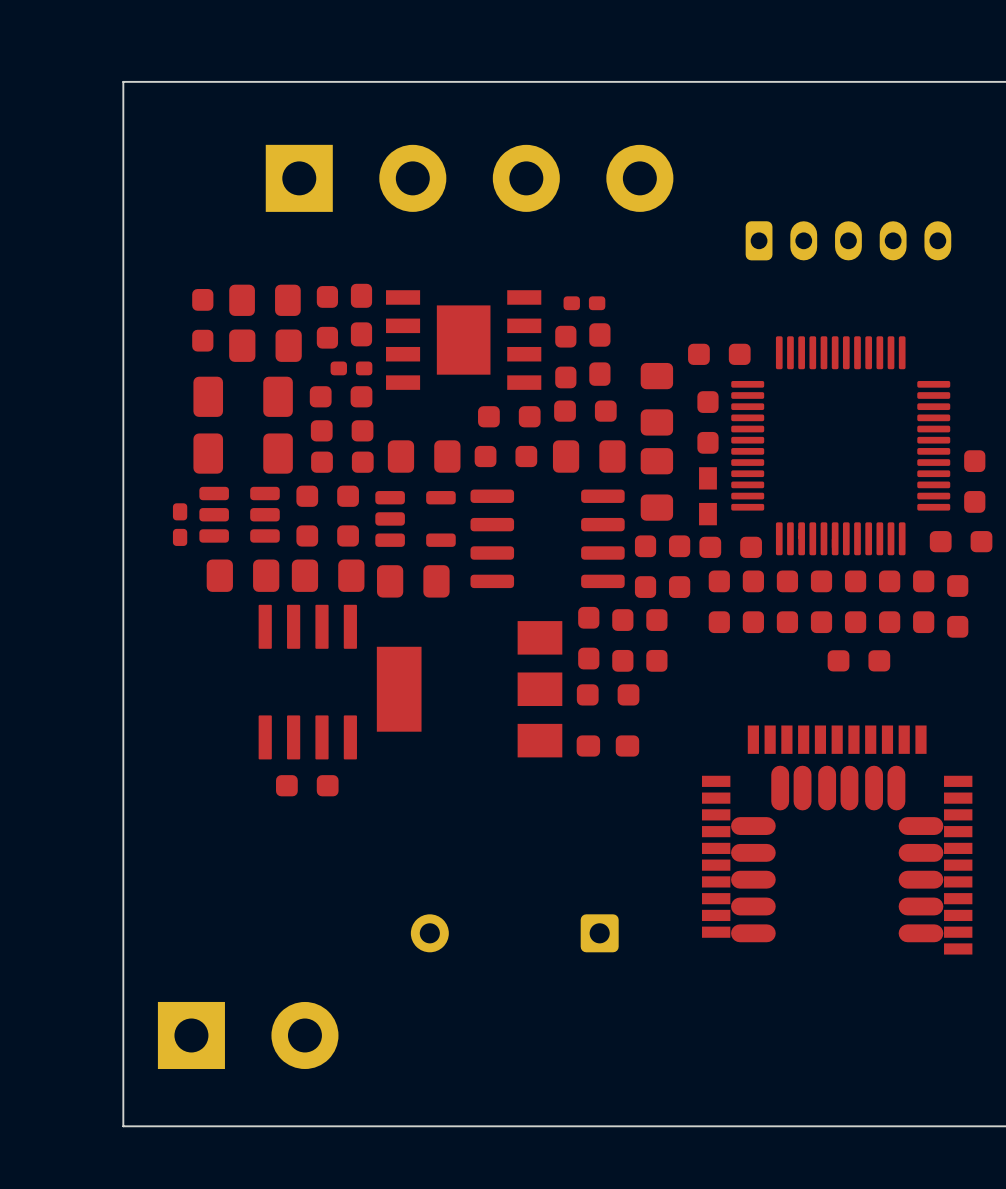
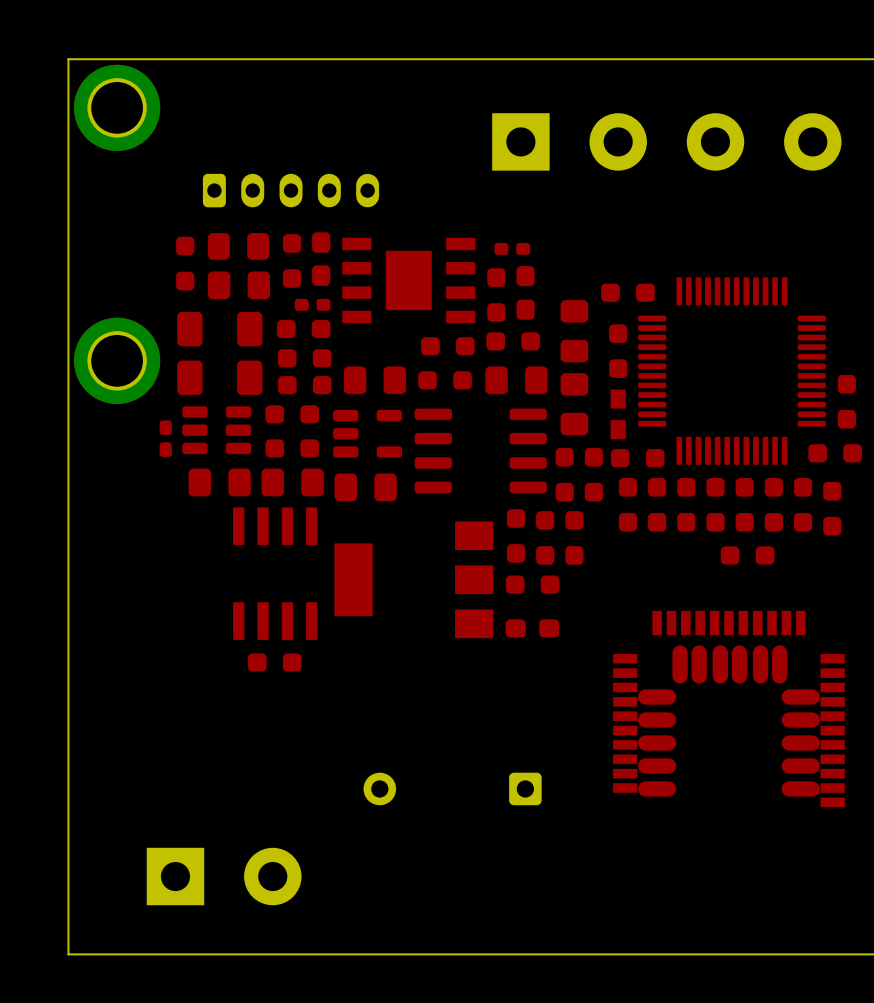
board edge: (123, 81) (123, 1126) -> (117, 59) (68, 59) (68, 954) (117, 954)
part: none -> (117, 107)
part position: (469, 178) -> (666, 141)
part position: (848, 240) -> (291, 190)
part: none -> (117, 360)

